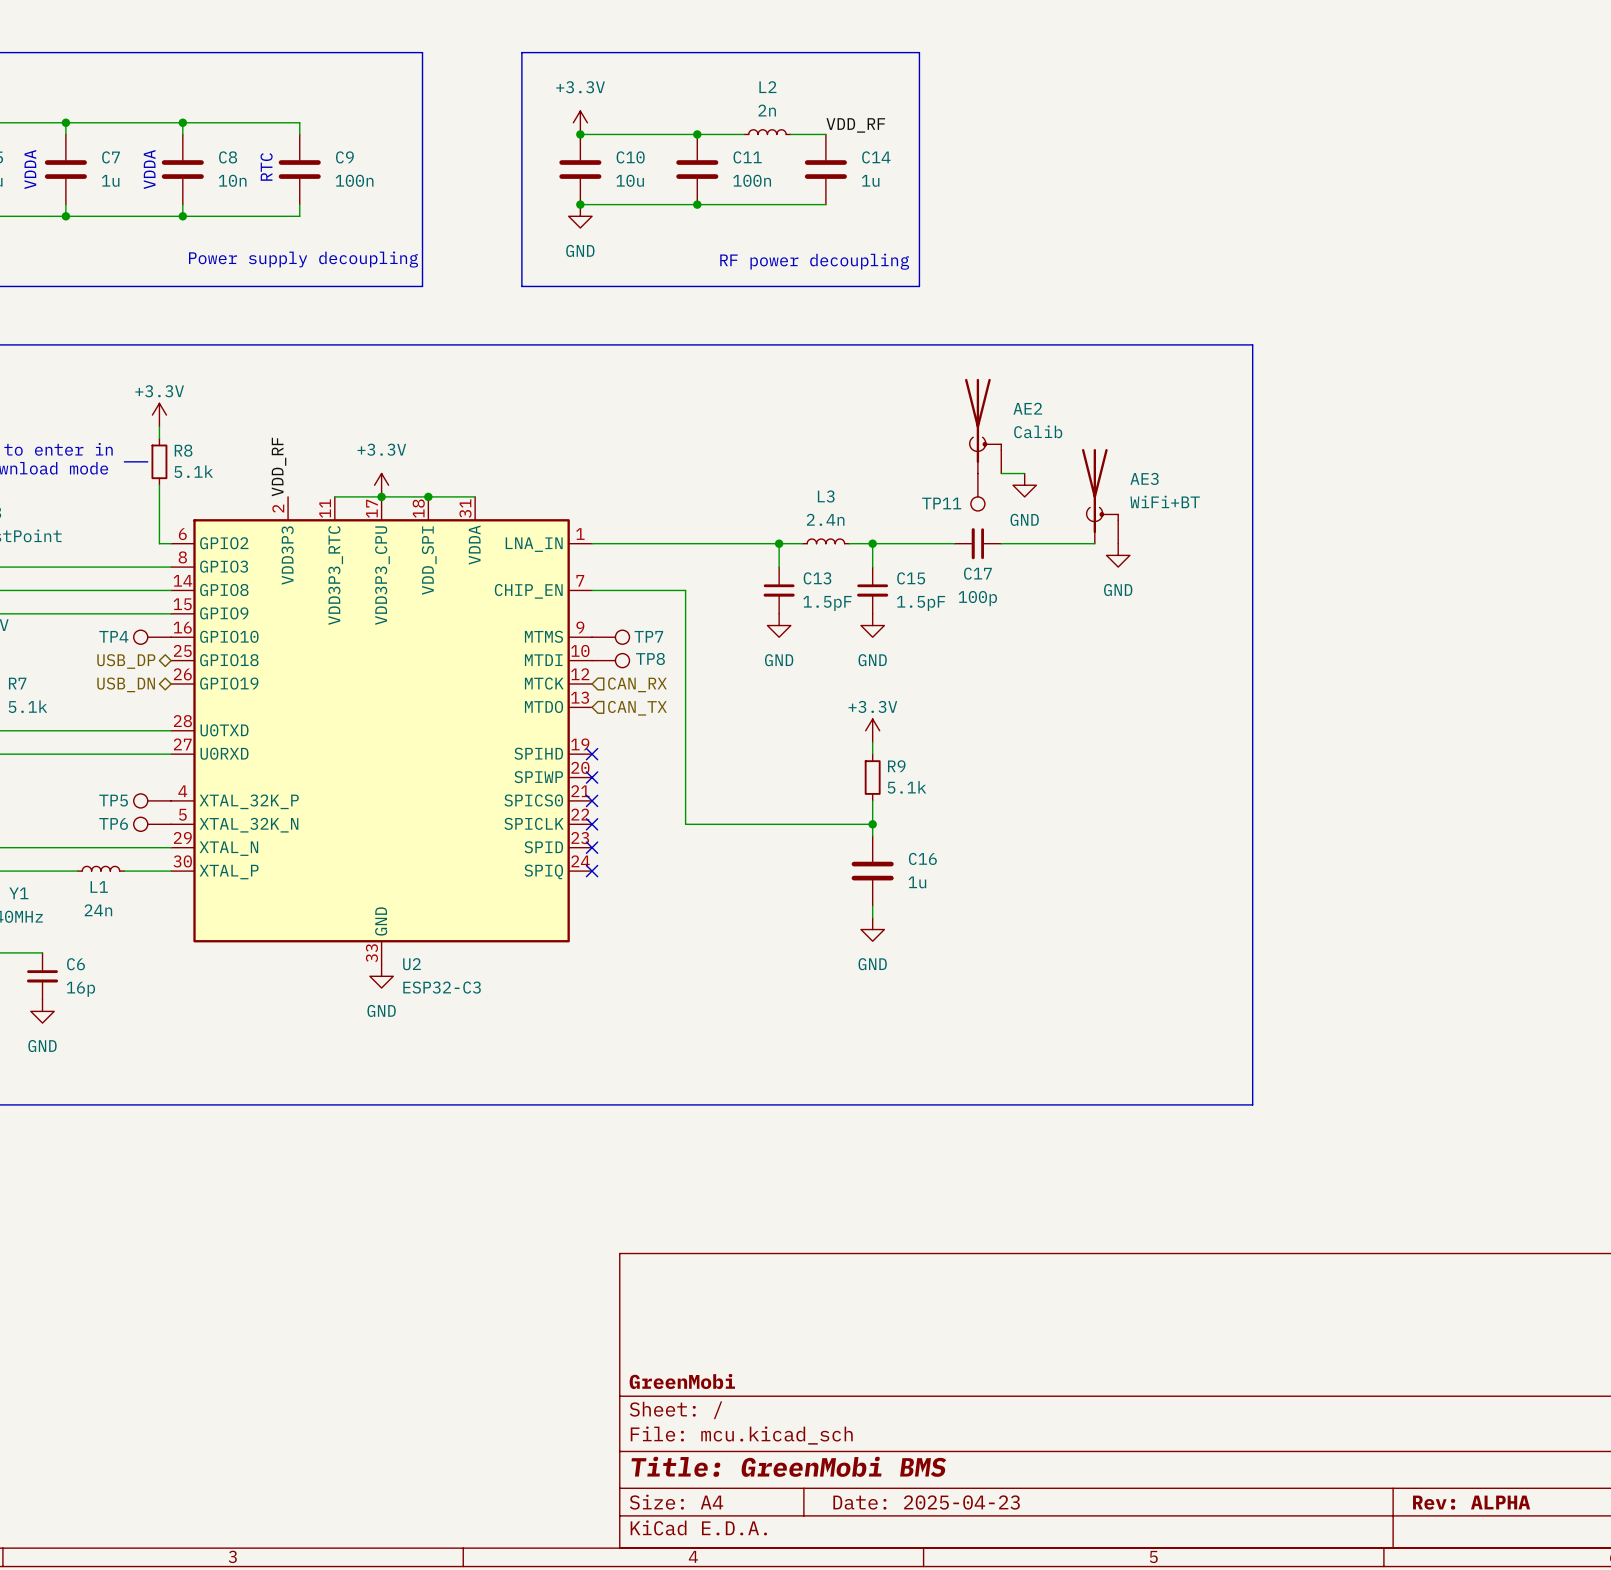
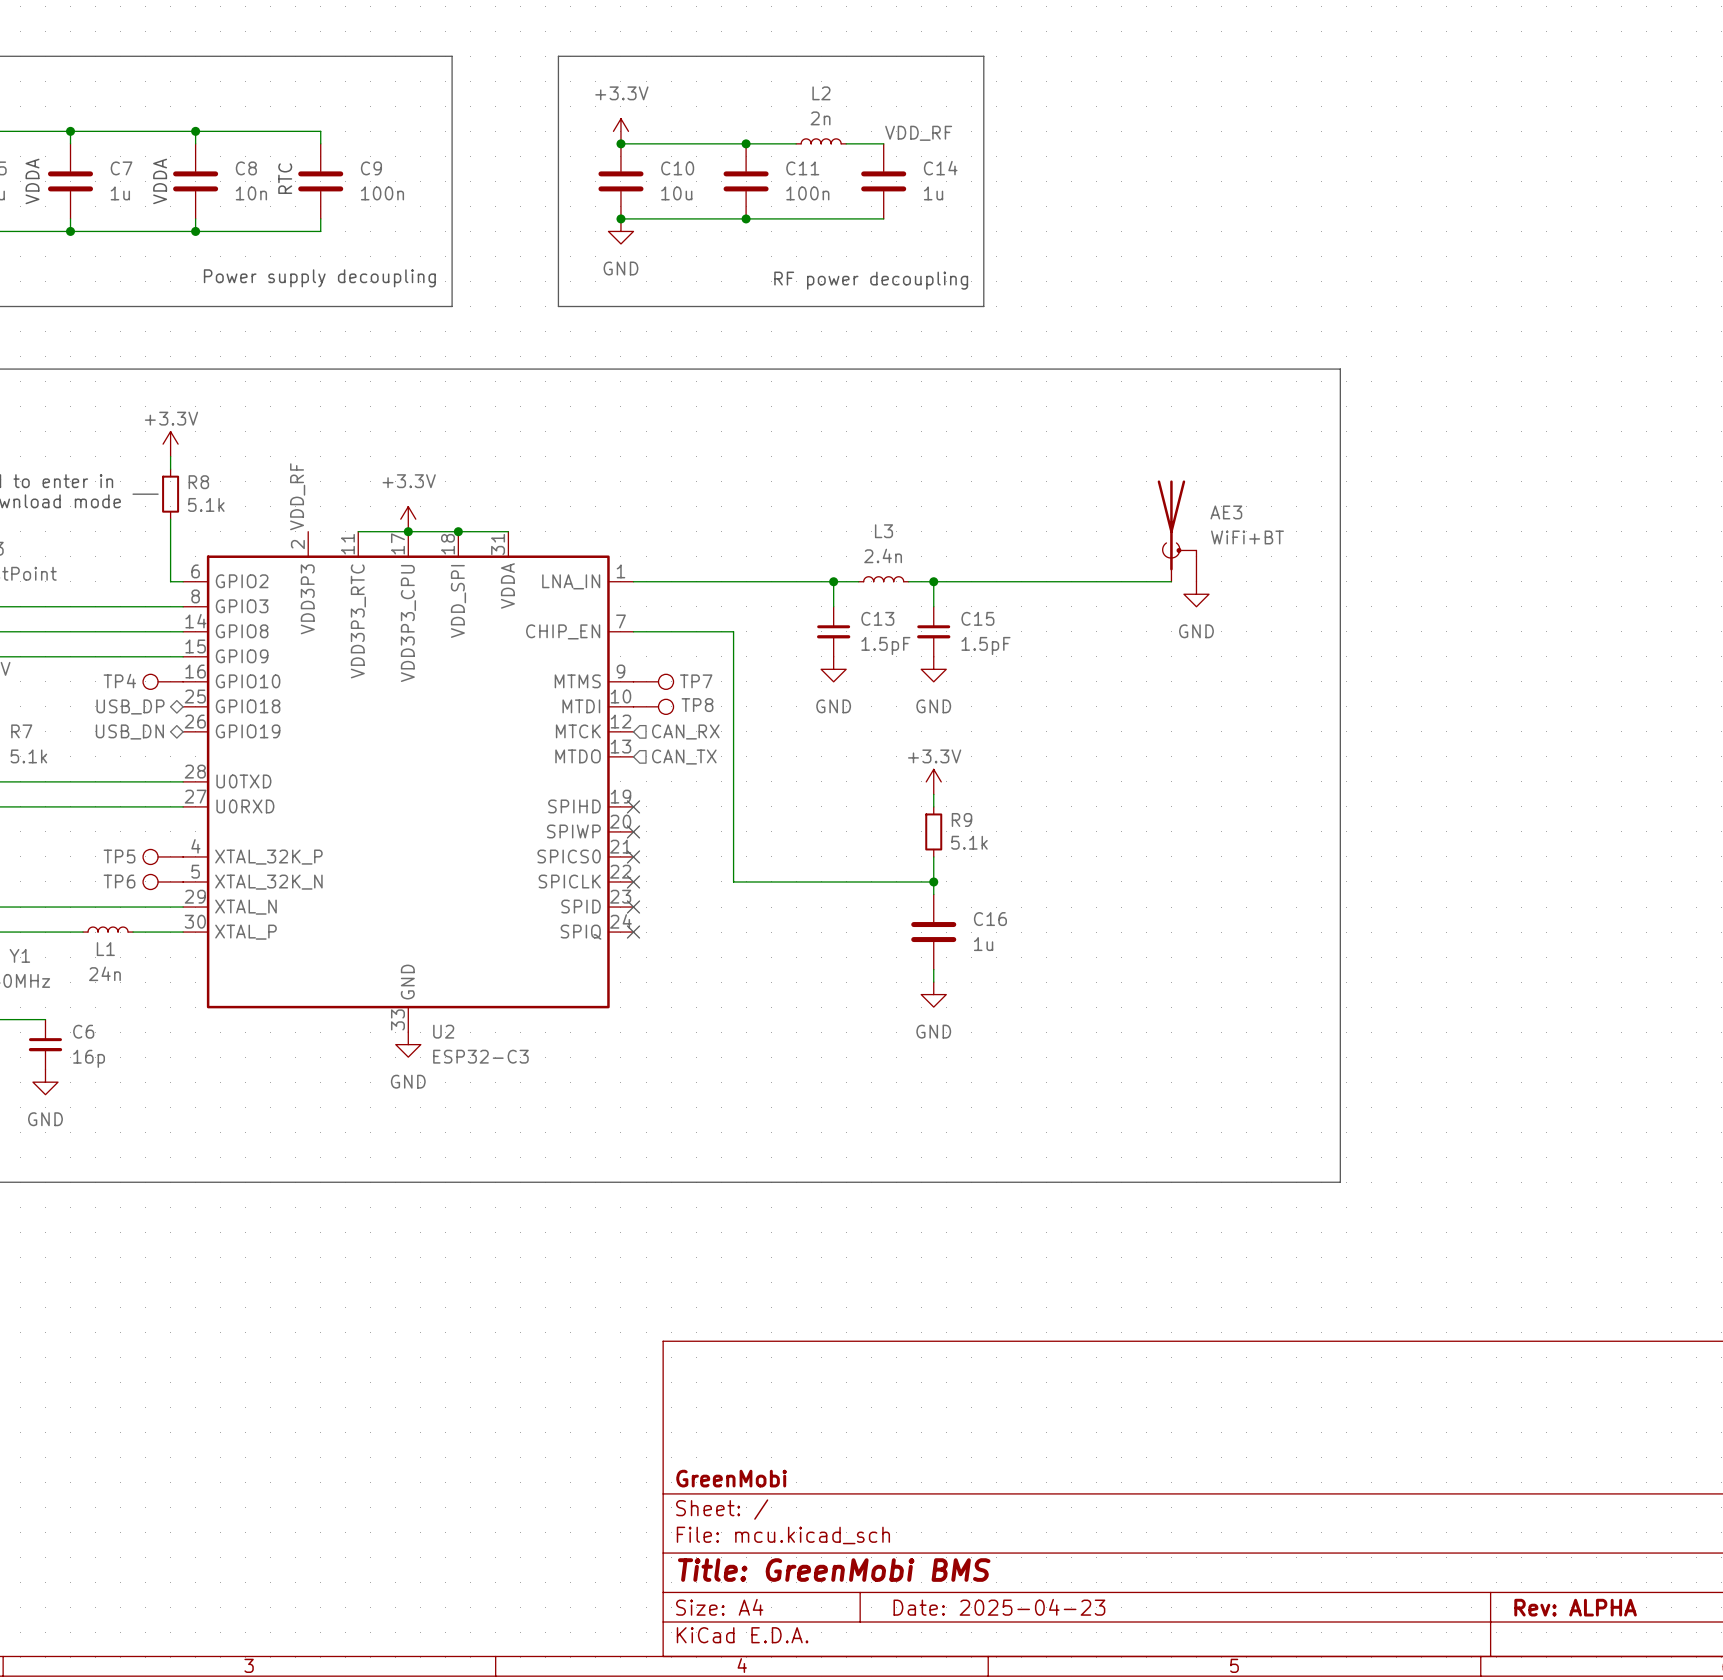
AE2: Calib (983, 426) -> none
wire: (1001, 473) (1024, 473) -> none
power symbol: GND (1024, 485) -> none
TP11: (977, 492) -> none
C17: 100p (977, 543) -> none

